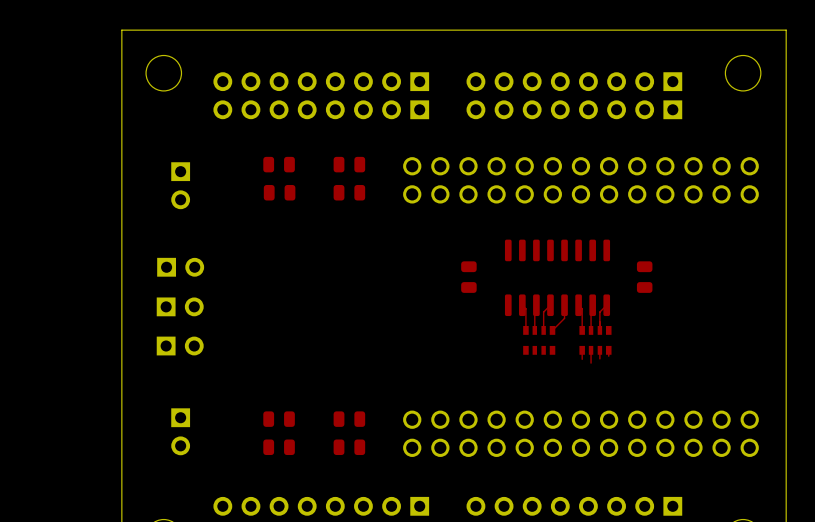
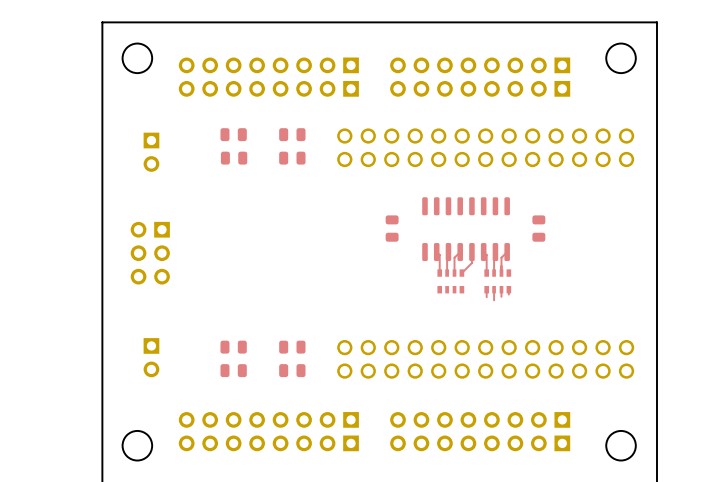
part: (180, 267) -> none
part footprint: [156, 297, 204, 317] -> [130, 221, 170, 285]
part: (180, 346) -> none

